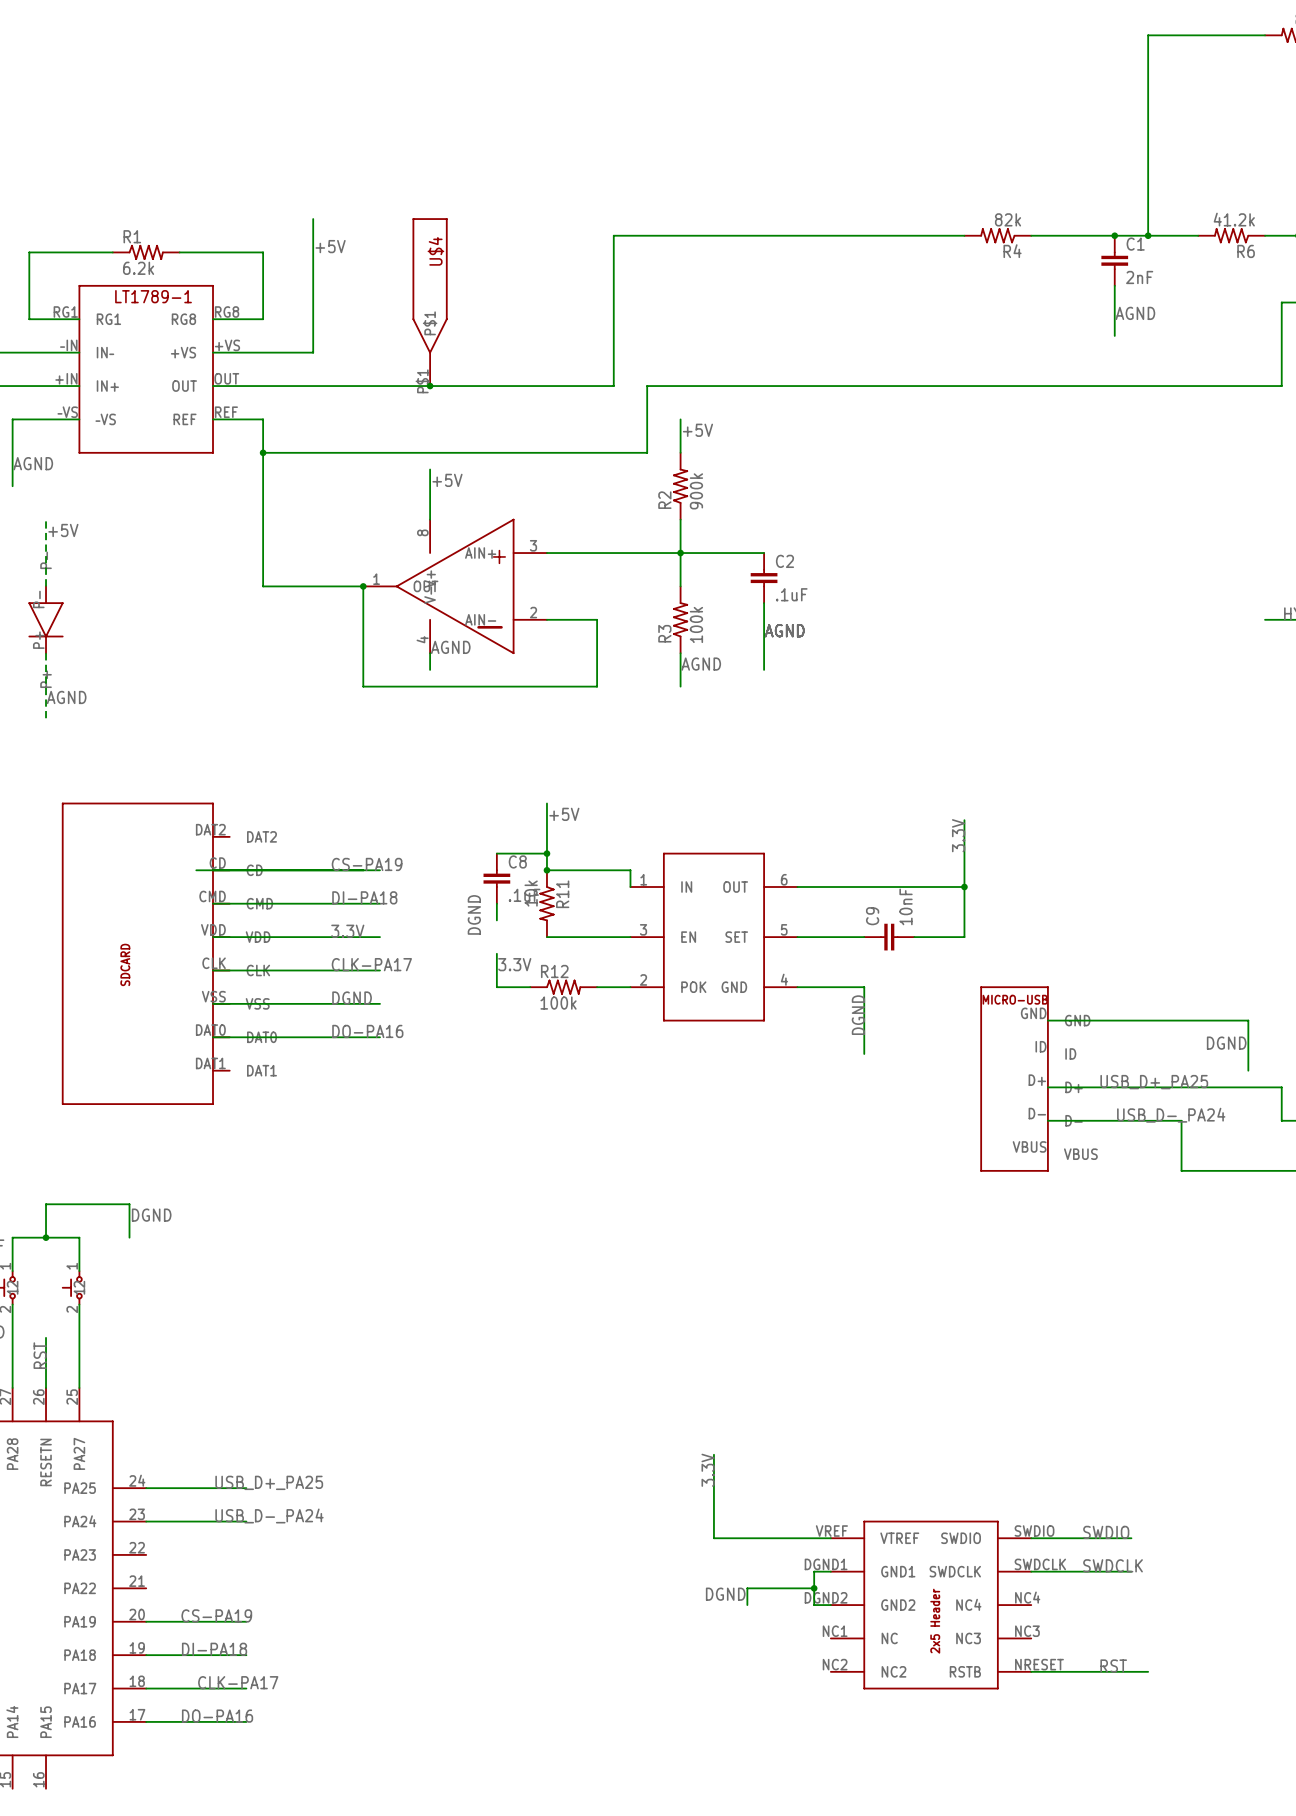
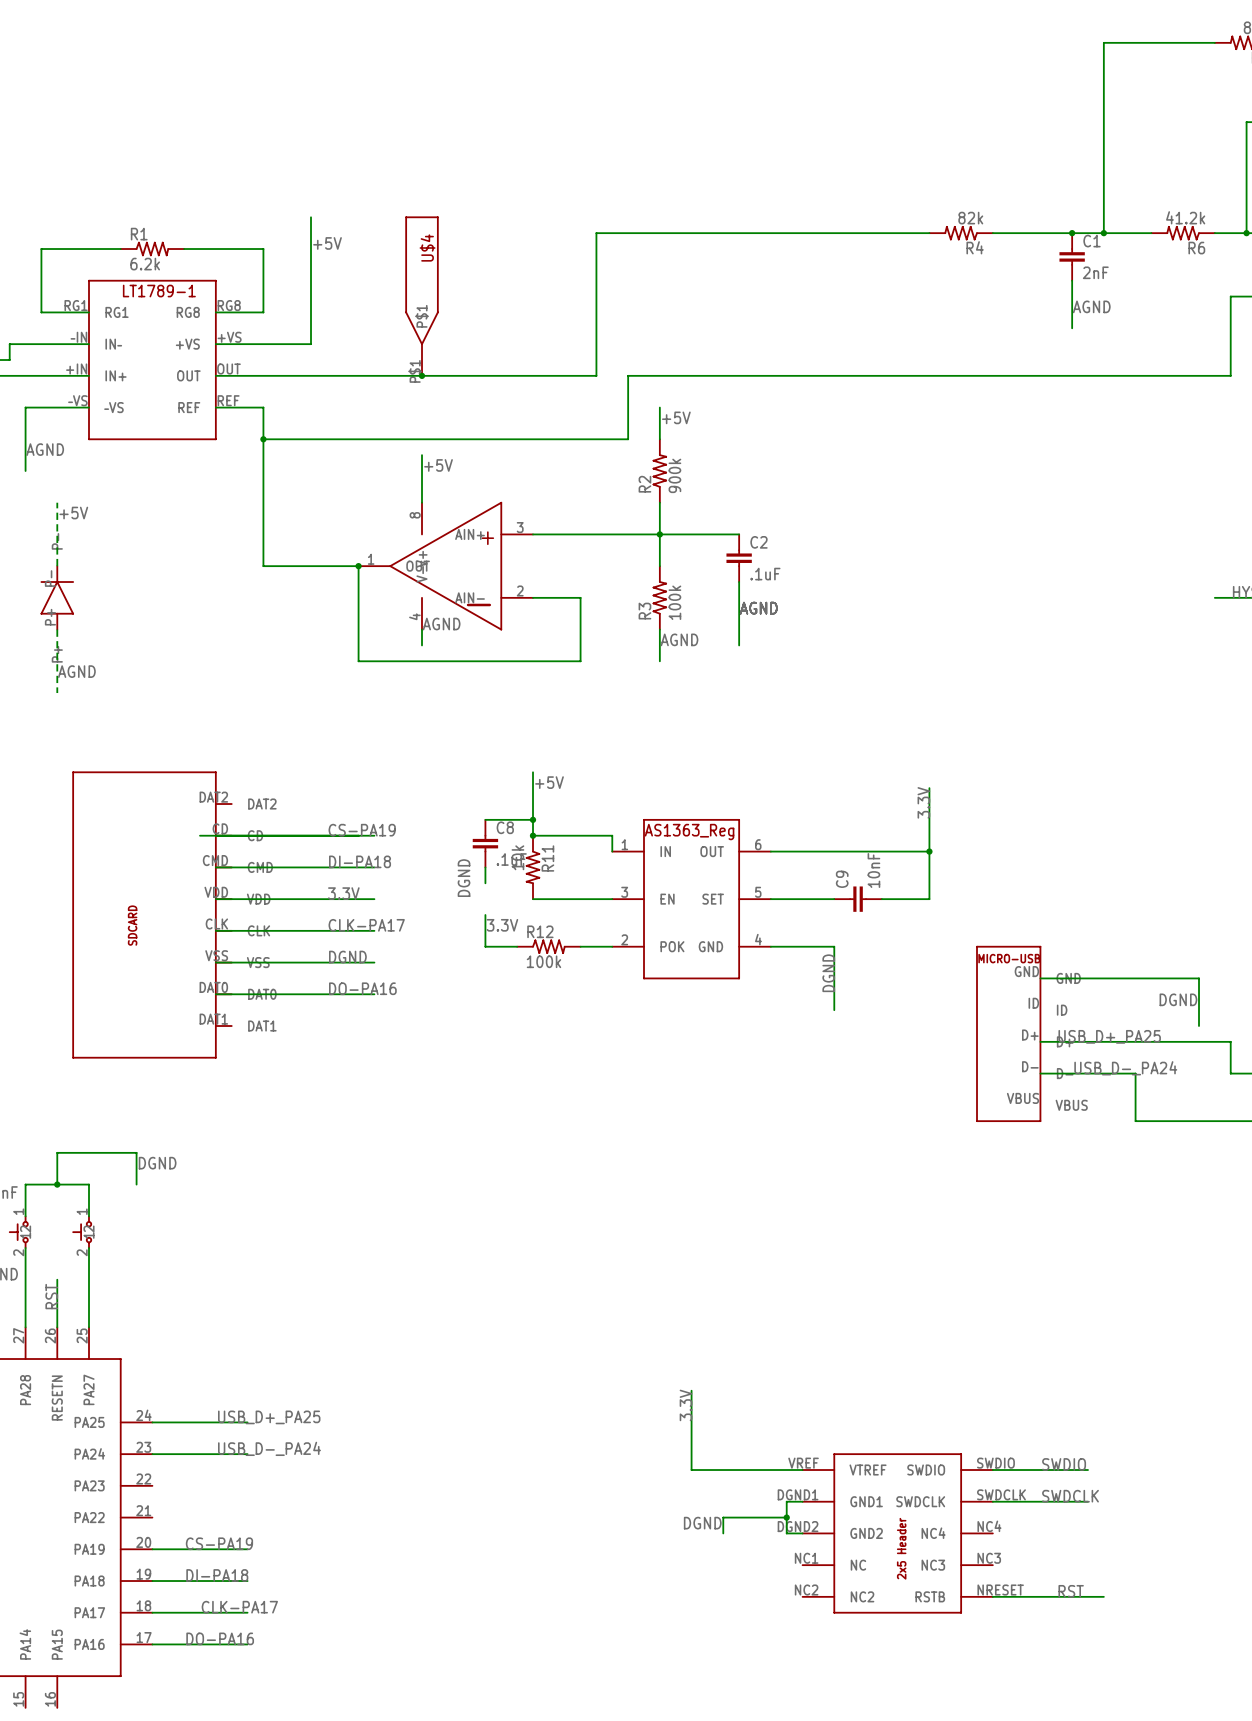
part symbol: [28, 586, 64, 654] -> [40, 566, 74, 630]
part text: none -> AS1363_Reg (689, 832)
wire: (1047, 1020) (1081, 1020) -> none
part position: (1014, 1079) -> (1008, 1033)
wire: (1047, 1087) (1081, 1087) -> none
wire: (1047, 1120) (1081, 1120) -> none

